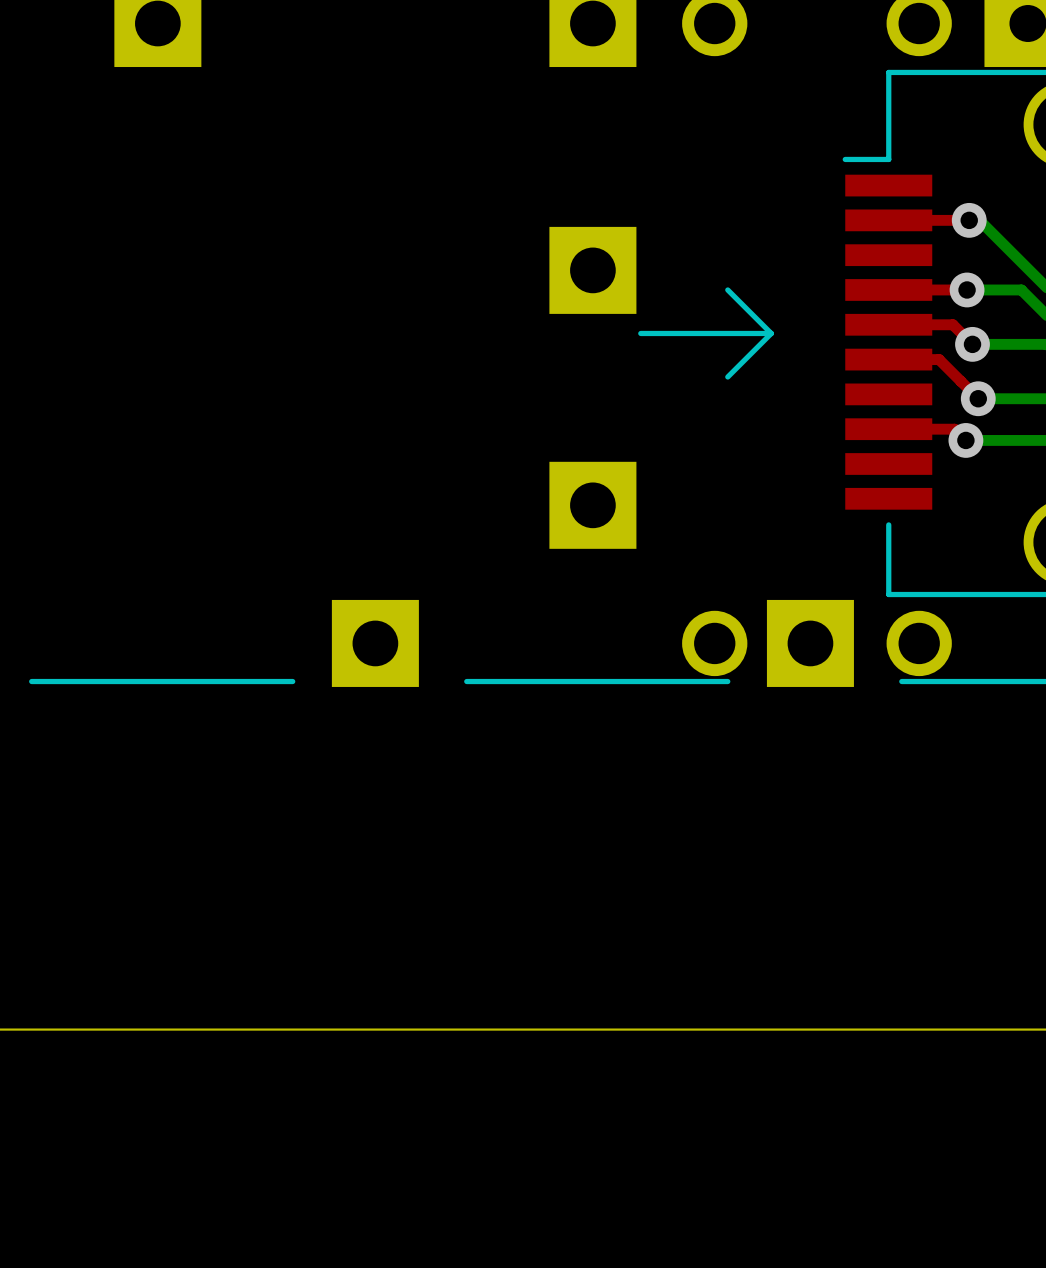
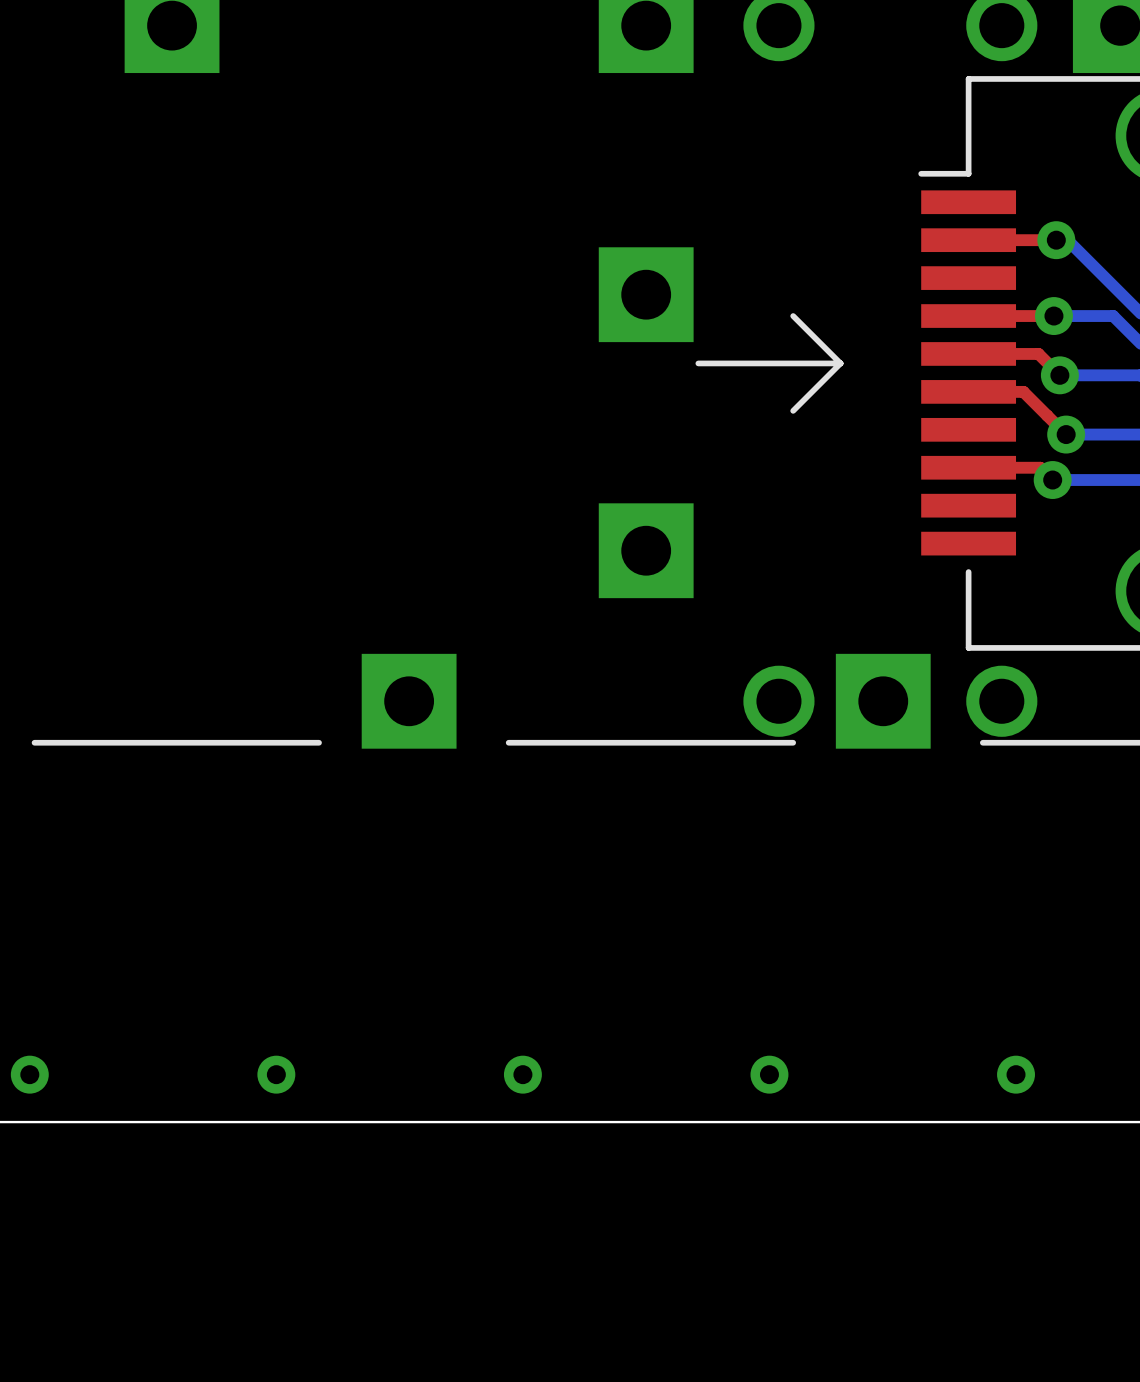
via: none -> (29, 1074)
via: none -> (276, 1074)
via: none -> (522, 1074)
via: none -> (769, 1074)
via: none -> (1016, 1074)

